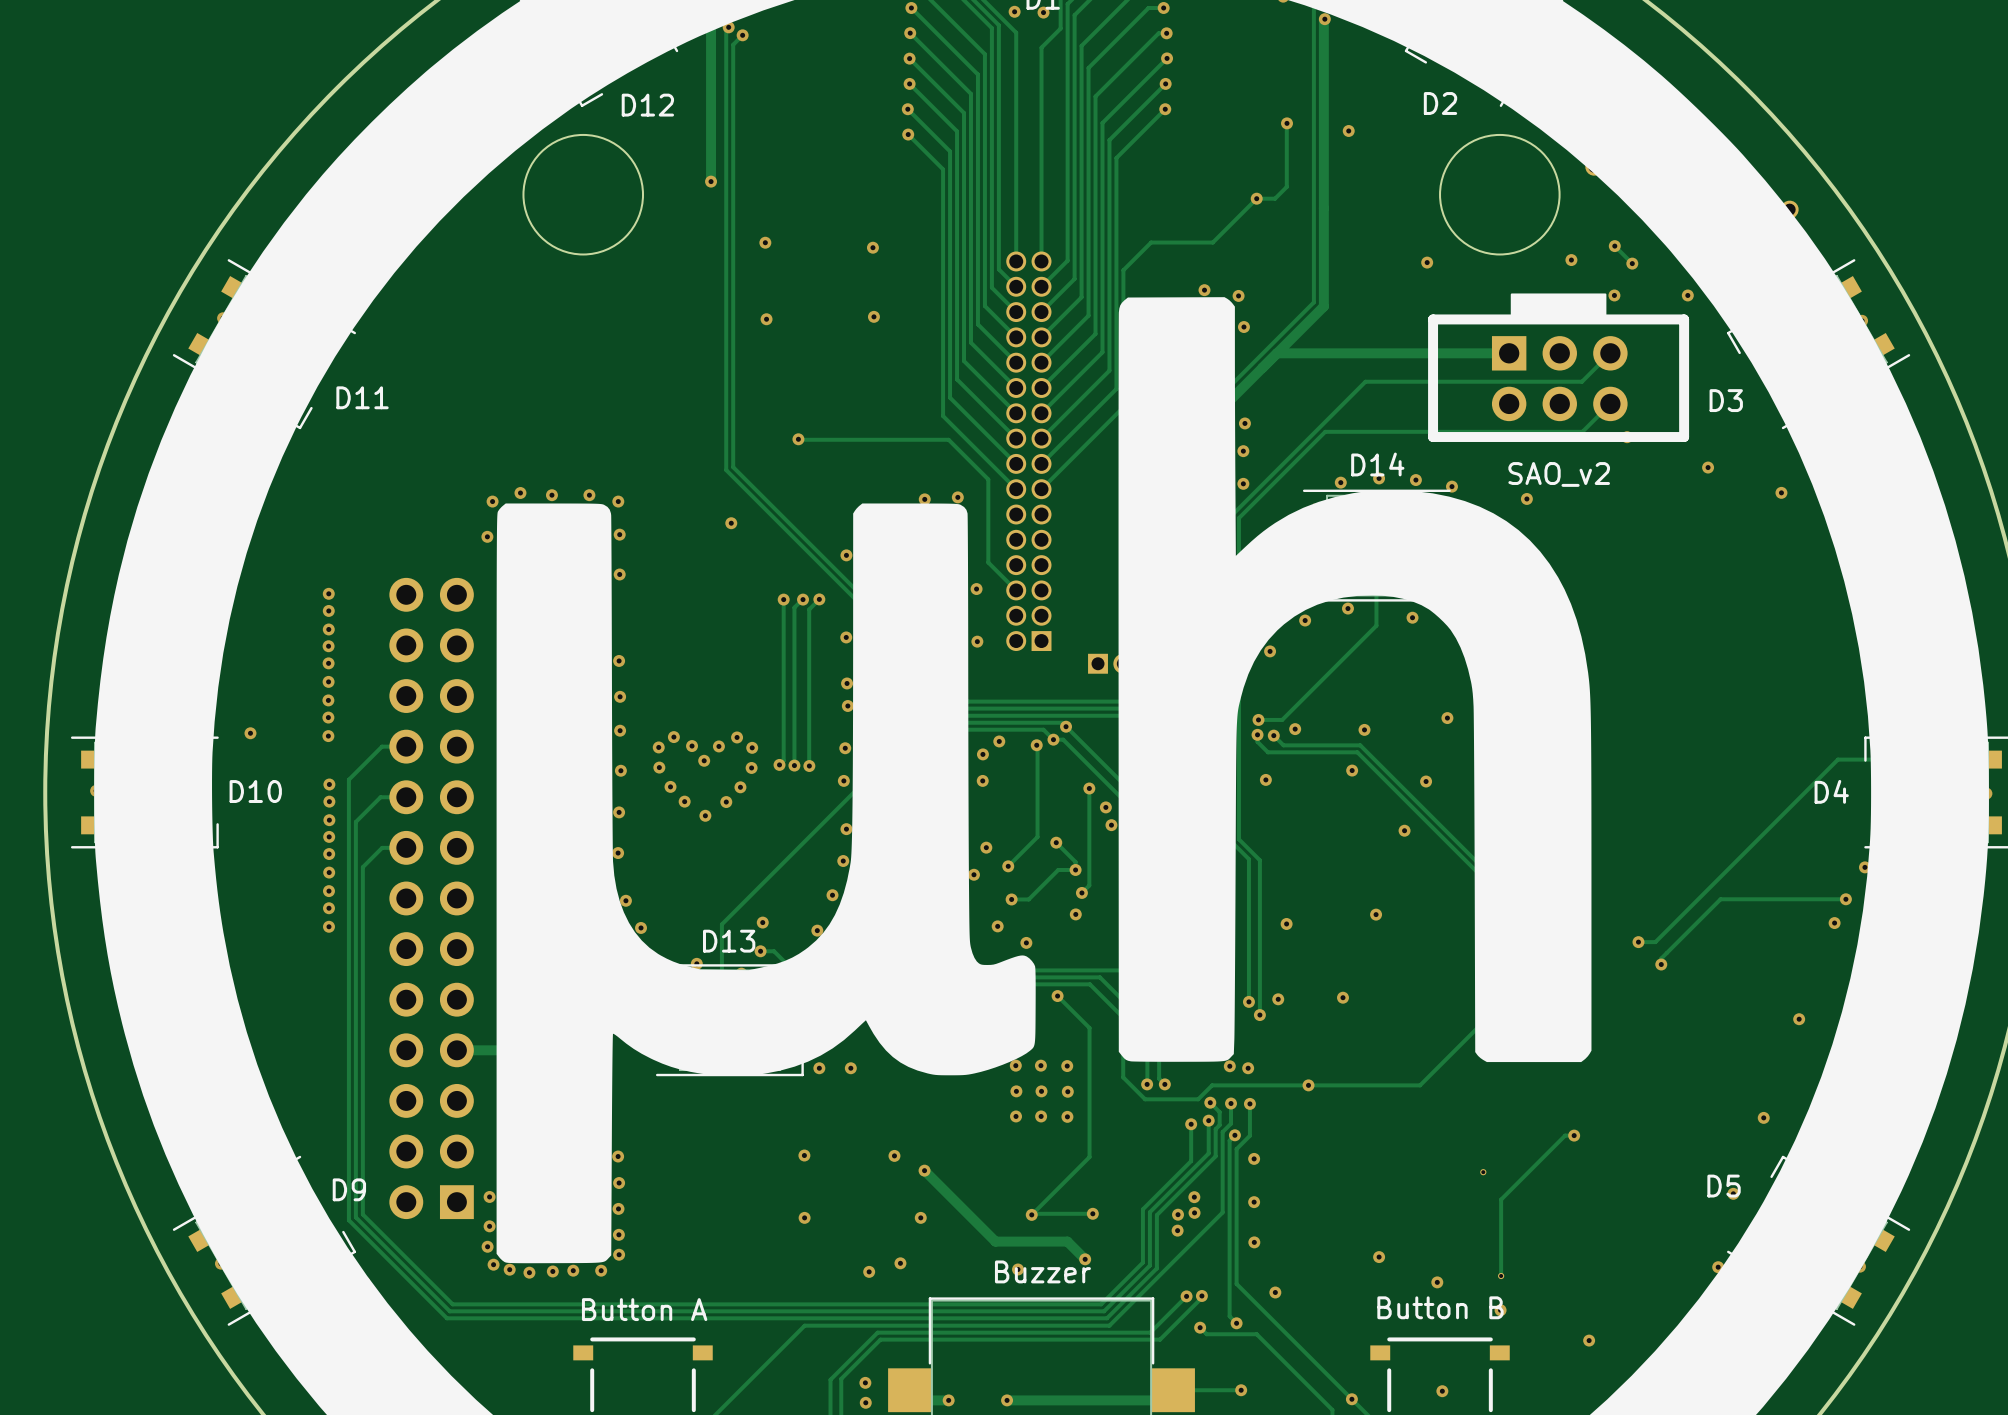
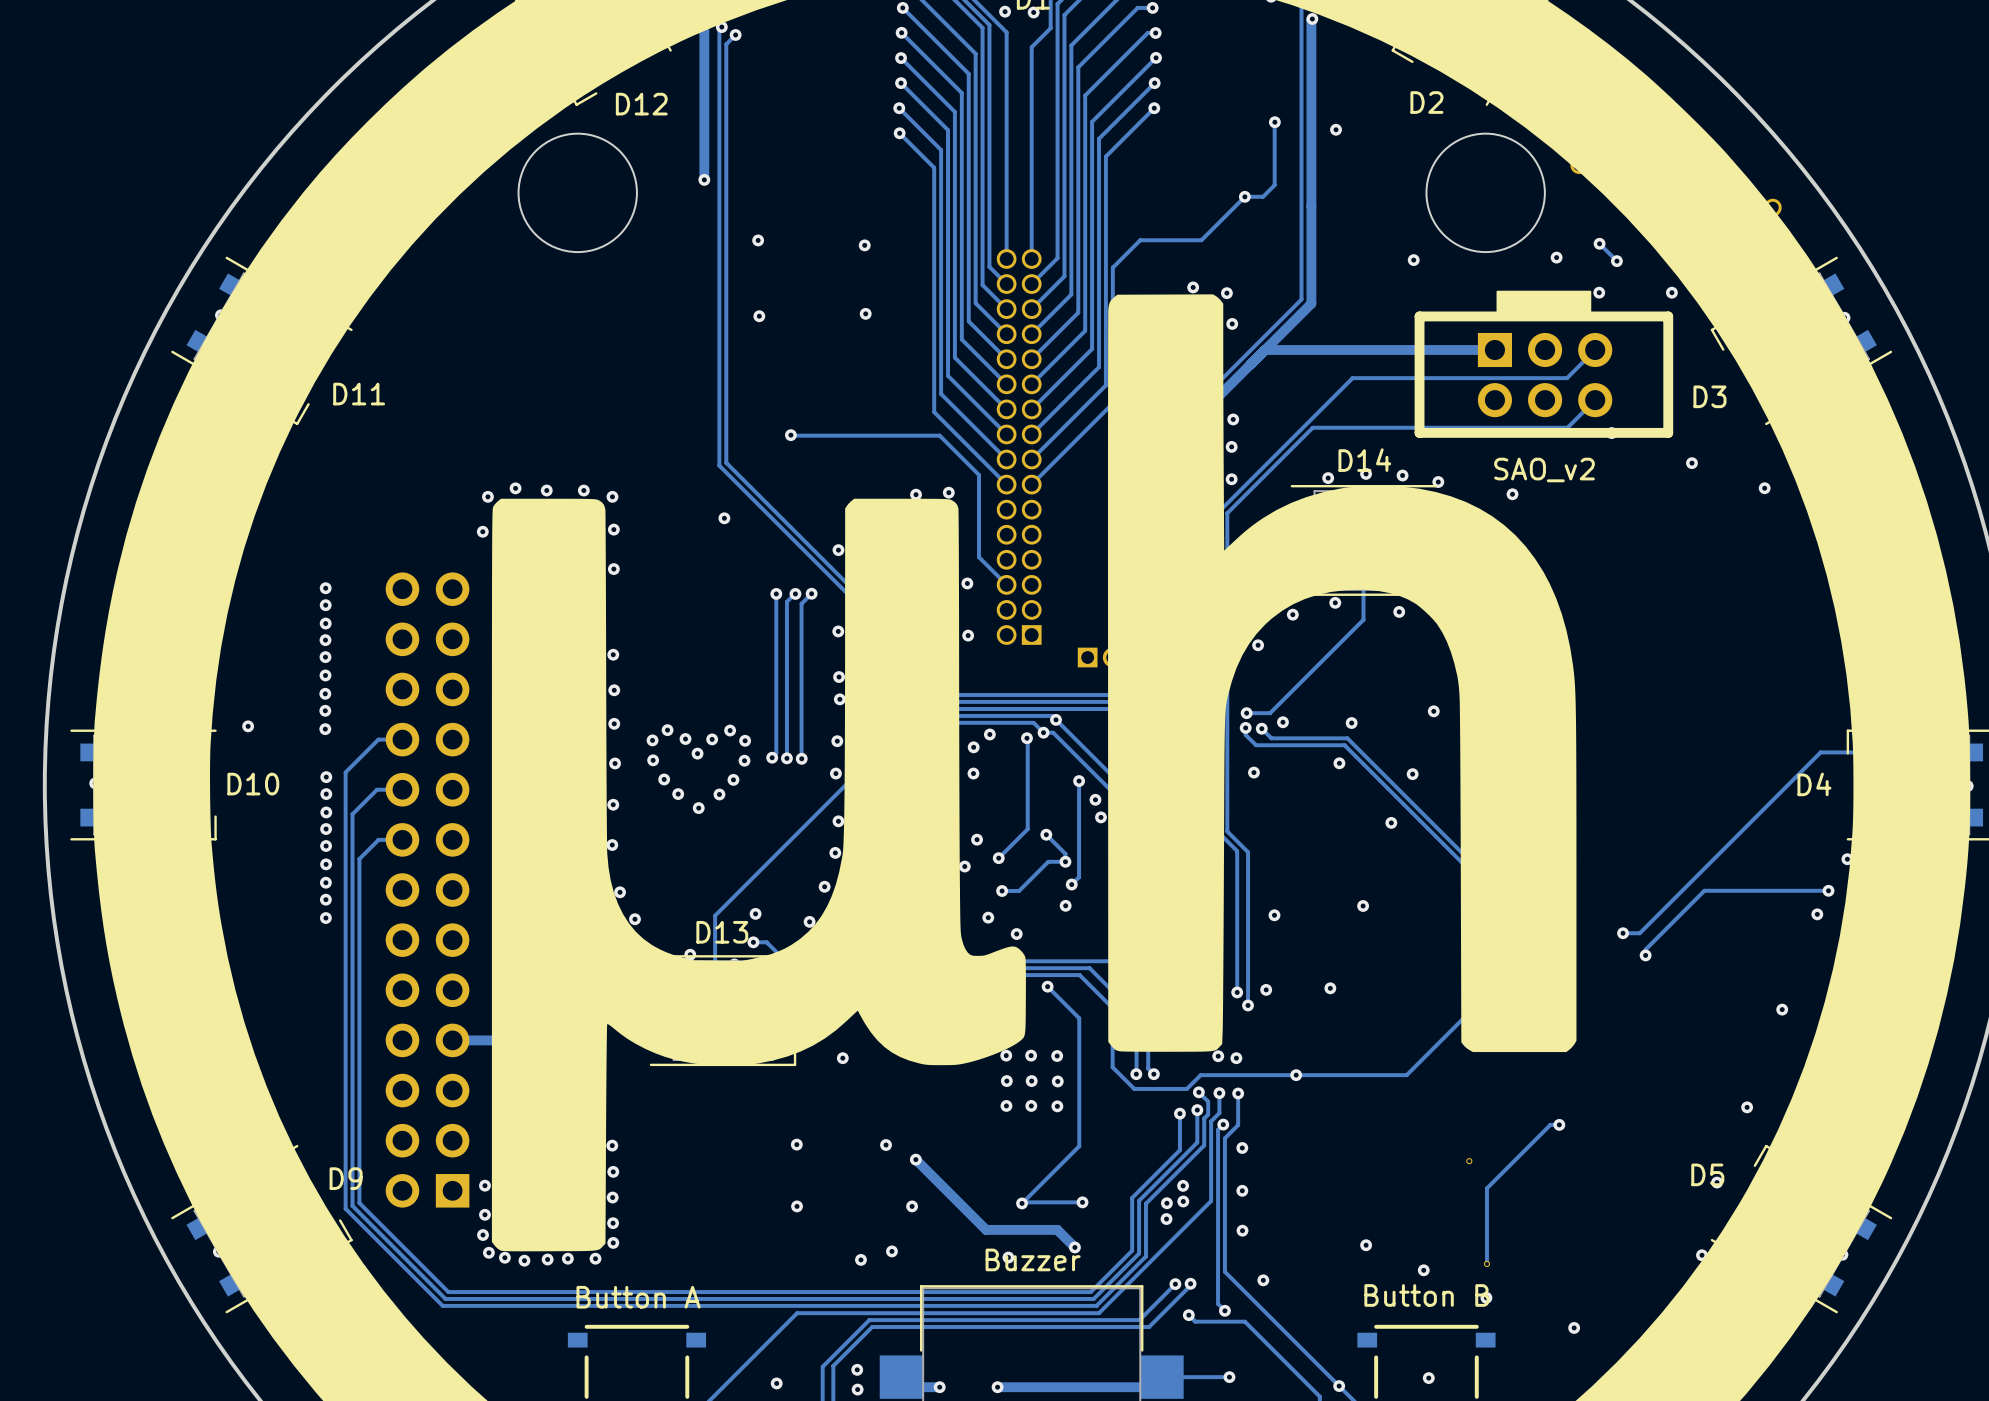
via: (819, 1068) -> none
via: none -> (776, 1383)

